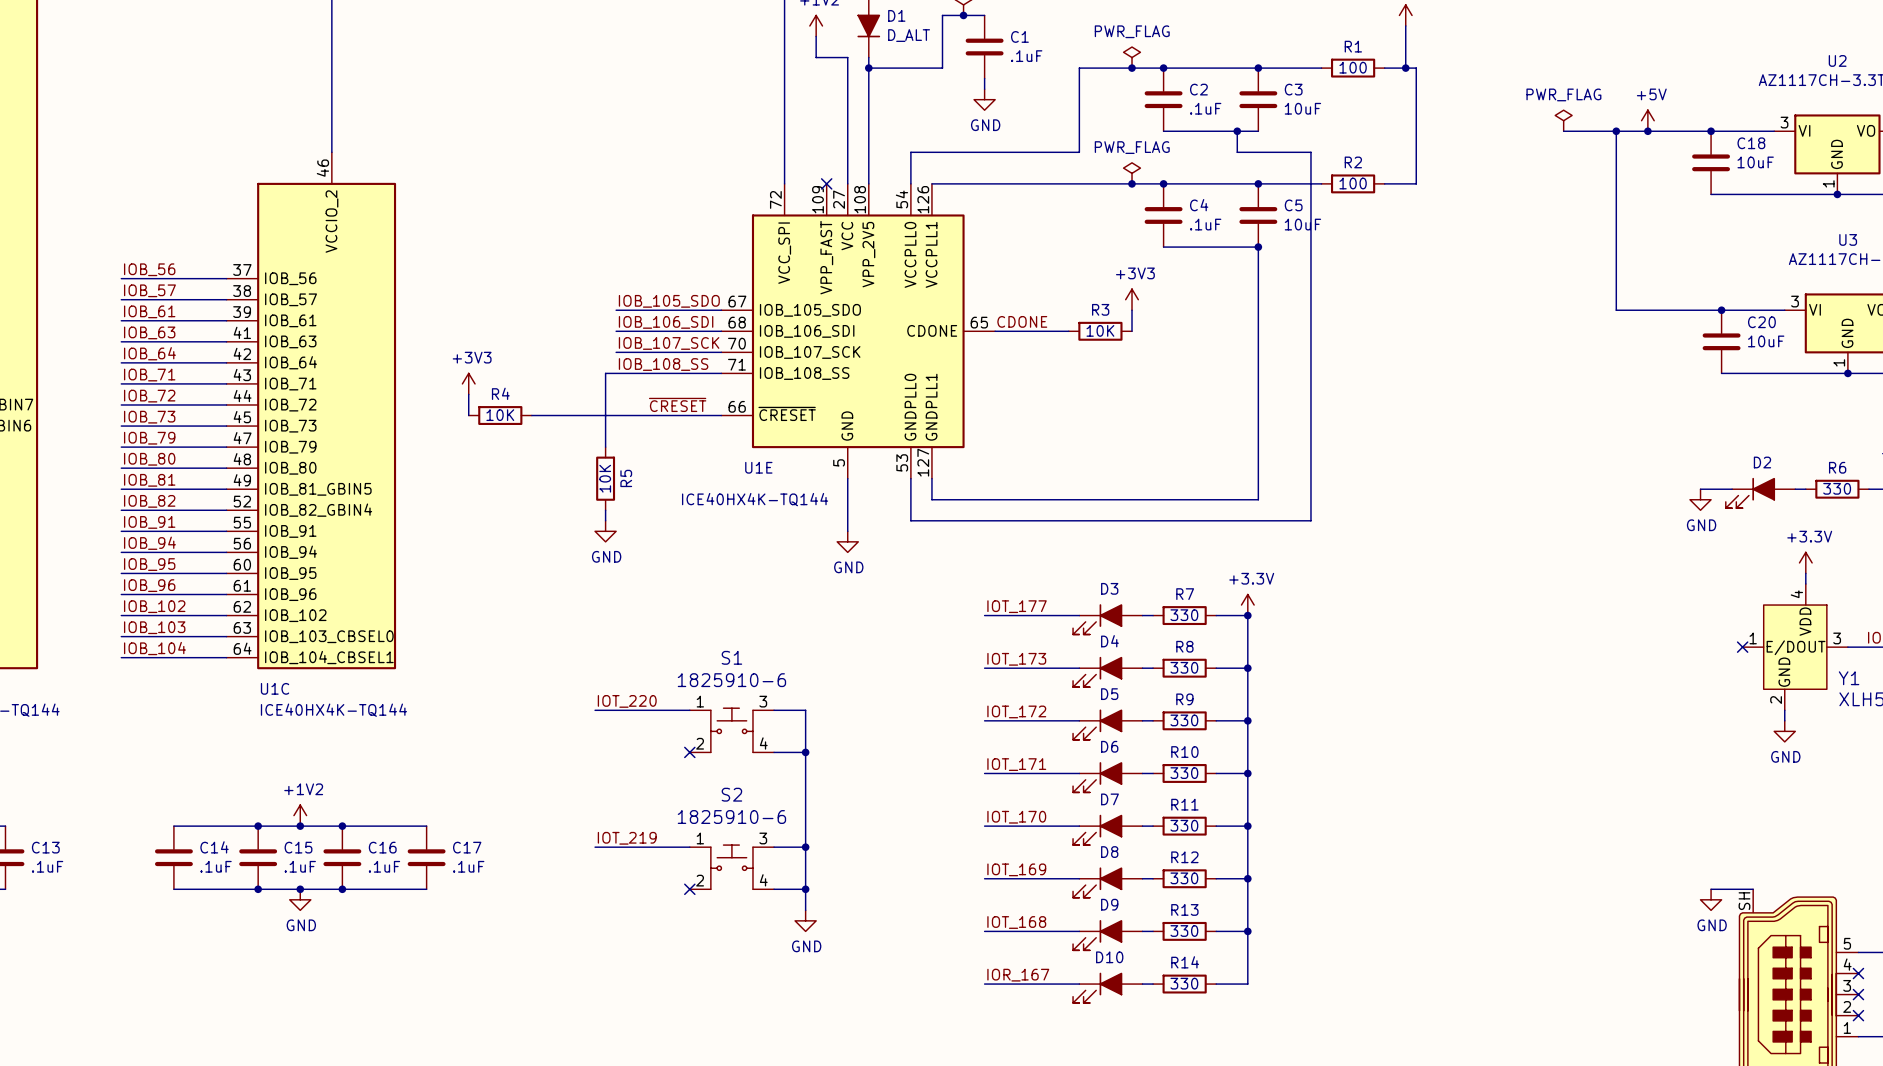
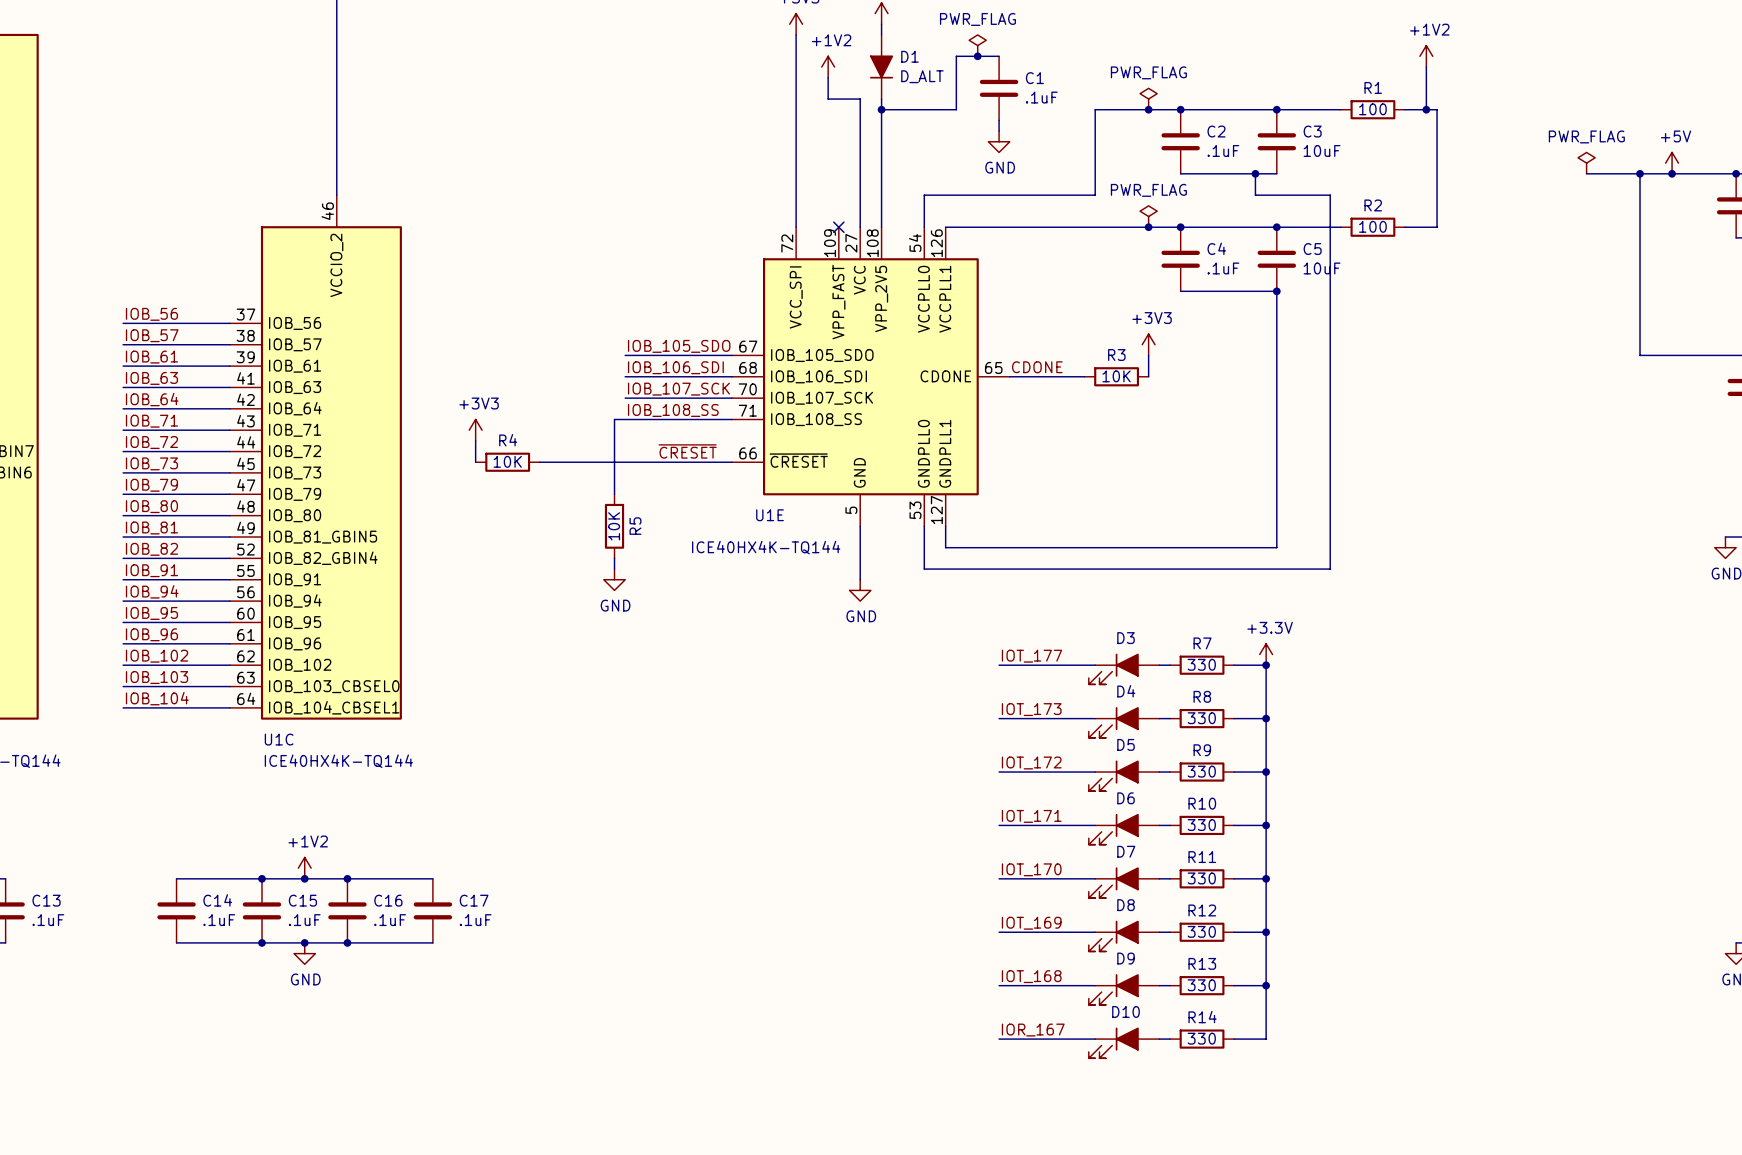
label: IOT_220 (627, 701) -> none
wire: (595, 710) (689, 710) -> none
wire: (774, 710) (805, 710) (805, 910) -> none
S1: 1825910-6 (731, 730) -> none
no-connect mark: (689, 752) -> none
wire: (774, 752) (805, 752) -> none
junction: (805, 752) -> none
label: IOT_219 (627, 838) -> none
wire: (595, 847) (689, 847) -> none
wire: (774, 847) (805, 847) -> none
junction: (805, 847) -> none
S2: 1825910-6 (731, 867) -> none
no-connect mark: (689, 889) -> none
wire: (774, 889) (805, 889) -> none
junction: (805, 889) -> none
power symbol: GND (805, 920) -> none

